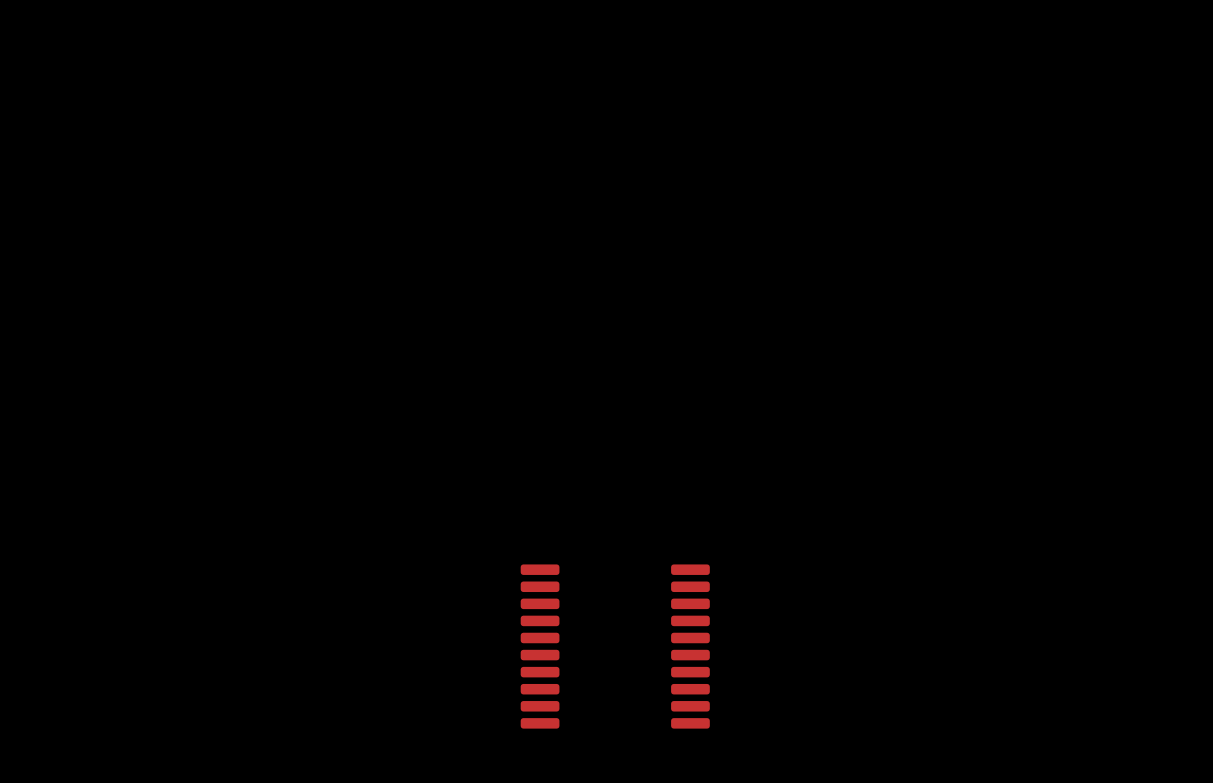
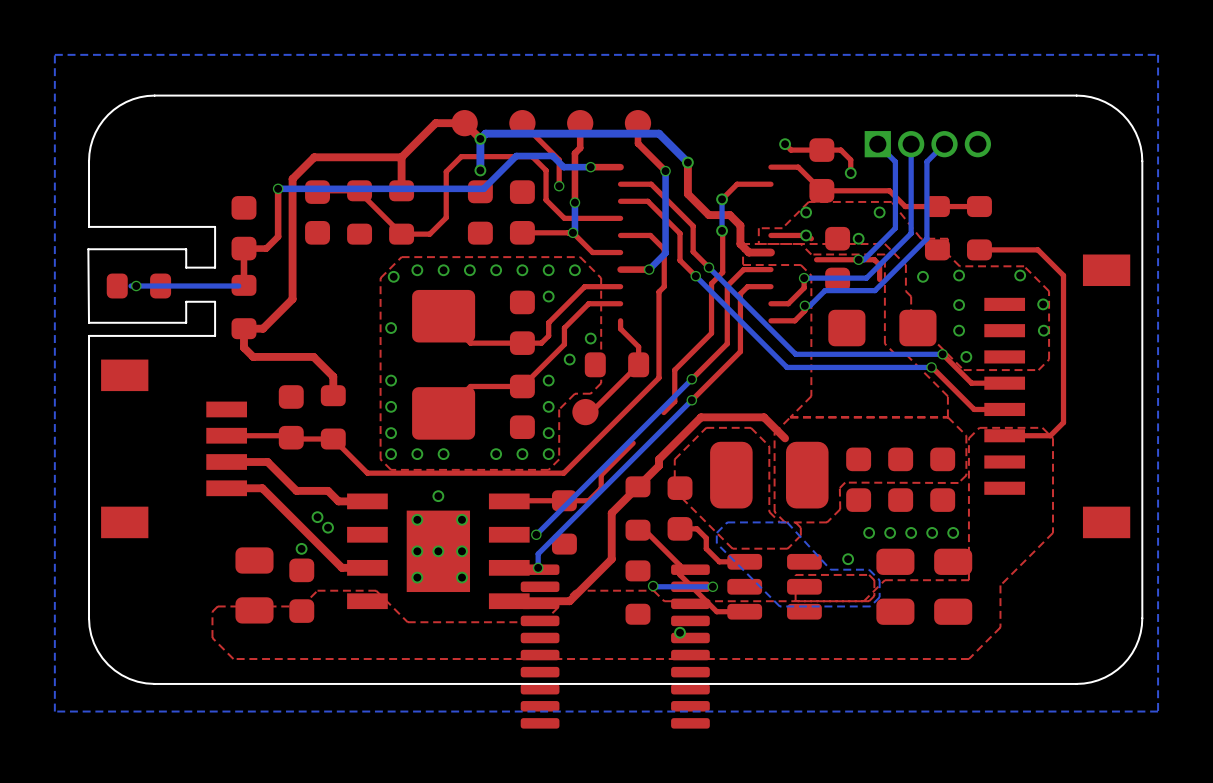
bottom zone outline: none -> (1158, 54) (1158, 711) (54, 711) (54, 54) (1158, 54)
board edge: none -> (1076, 95) (154, 95) (132, 99) (119, 105) (108, 114) (99, 126) (90, 146) (89, 226) (215, 226) (215, 267) (186, 267) (186, 249) (88, 249) (89, 322) (186, 322) (186, 301) (215, 301) (215, 335) (89, 335) (89, 618) (91, 635) (97, 651) (108, 664) (121, 675) (137, 681) (154, 683) (1076, 683) (1091, 682) (1111, 673) (1123, 664) (1132, 653) (1138, 639) (1141, 625) (1141, 153) (1135, 132) (1123, 114) (1105, 102) (1091, 97) (1076, 95)
part: none -> (464, 123)
top track: none -> (522, 123) (559, 159) (559, 186)
part: none -> (522, 123)
top track: none -> (580, 123) (580, 148) (574, 153) (574, 202)
part: none -> (580, 123)
top track: none -> (637, 123) (637, 143) (665, 171)
part: none -> (637, 123)
top track: none -> (480, 138) (464, 123) (435, 123) (401, 157)
via: none -> (480, 138)
top track: none -> (785, 144) (790, 150) (840, 150) (850, 159) (850, 173)
via: none -> (785, 144)
bottom track: none -> (877, 144) (895, 161) (895, 228) (863, 259) (858, 259)
bottom track: none -> (911, 144) (911, 233) (866, 278) (804, 278)
part: none -> (927, 144)
bottom track: none -> (944, 144) (926, 161) (926, 238) (875, 290) (825, 290) (809, 305) (804, 305)
top track: none -> (401, 157) (314, 157) (292, 178) (292, 299) (263, 328) (243, 328) (243, 347) (253, 356) (313, 356) (333, 376) (333, 395)
top track: none -> (401, 157) (402, 191)
top track: none -> (687, 162) (687, 194) (708, 215) (729, 215) (740, 225) (740, 243) (748, 252) (770, 252)
bottom track: none -> (687, 162) (659, 133) (485, 133) (480, 138) (480, 170)
via: none -> (687, 162)
bottom track: none -> (590, 167) (563, 167) (552, 155) (516, 155) (483, 188) (278, 188)
via: none -> (590, 167)
top track: none -> (620, 167) (590, 167)
top track: none -> (770, 167) (798, 167) (821, 190) (889, 190) (905, 206) (979, 206)
via: none -> (480, 170)
part: none -> (821, 170)
bottom track: none -> (665, 171) (665, 253) (649, 269)
via: none -> (665, 171)
via: none -> (850, 173)
top track: none -> (620, 184) (651, 184) (693, 226) (693, 251) (708, 267)
top track: none -> (770, 184) (737, 184) (722, 199)
via: none -> (559, 186)
top track: none -> (278, 188) (278, 236) (266, 248) (243, 248) (243, 285)
via: none -> (278, 188)
top track: none -> (317, 192) (359, 190) (401, 234) (429, 234) (446, 217) (446, 171) (461, 156) (532, 156) (546, 170) (546, 199) (564, 218) (620, 218)
bottom track: none -> (722, 199) (722, 230)
via: none -> (722, 199)
top track: none -> (620, 201) (647, 201) (680, 233) (680, 260) (695, 276)
bottom track: none -> (574, 202) (574, 230) (572, 232)
via: none -> (574, 202)
part: none -> (317, 212)
part: none -> (359, 212)
part: none -> (401, 212)
part: none -> (480, 212)
part: none -> (522, 212)
via: none -> (806, 212)
via: none -> (879, 212)
part: none -> (243, 228)
part: none -> (937, 228)
part: none -> (979, 228)
top track: none -> (722, 230) (722, 272) (711, 283) (711, 333) (674, 370) (674, 401) (663, 412)
via: none -> (722, 230)
top track: none -> (522, 232) (572, 232) (592, 252) (620, 252)
via: none -> (572, 232)
top track: none -> (620, 235) (650, 235) (664, 249) (664, 286) (659, 291) (659, 377) (563, 473) (367, 473) (333, 439) (292, 439) (289, 435) (226, 435)
top track: none -> (770, 235) (808, 235) (811, 238)
via: none -> (806, 235)
via: none -> (858, 238)
top zone outline: none -> (758, 243) (758, 228) (782, 228) (808, 201) (891, 201) (921, 238) (947, 238) (947, 254) (959, 266) (1024, 266) (1049, 291) (1049, 359) (1038, 370) (963, 370) (911, 317) (911, 296) (905, 291) (905, 265) (884, 243) (743, 243) (743, 265) (800, 265) (811, 275) (811, 396) (774, 433) (774, 511) (785, 522)
top zone outline: none -> (800, 243) (811, 254) (884, 254) (884, 343) (895, 354) (905, 354) (947, 396) (947, 417)
top track: none -> (979, 249) (1037, 249) (1063, 275) (1063, 422) (1050, 435) (1007, 435)
top zone outline: none -> (580, 257) (401, 257) (380, 278) (380, 459) (391, 469) (548, 469) (559, 459) (559, 409) (574, 393) (590, 393) (601, 383) (601, 278) (580, 257)
top track: none -> (816, 259) (874, 259) (879, 265) (879, 279)
part: none -> (837, 259)
via: none -> (858, 259)
bottom track: none -> (708, 267) (795, 354) (942, 354)
via: none -> (708, 267)
top track: none -> (649, 269) (620, 269)
via: none -> (649, 269)
top track: none -> (770, 269) (743, 269) (727, 286) (727, 343) (691, 379)
via: none -> (417, 270)
via: none -> (443, 270)
via: none -> (469, 270)
via: none -> (496, 270)
via: none -> (522, 270)
via: none -> (548, 270)
via: none -> (574, 270)
via: none -> (959, 275)
via: none -> (1020, 275)
via: none -> (393, 276)
bottom track: none -> (695, 276) (787, 367) (931, 367)
via: none -> (695, 276)
via: none -> (922, 276)
top track: none -> (804, 278) (804, 287) (788, 303) (770, 303)
via: none -> (804, 278)
via: none -> (136, 286)
part: none -> (138, 286)
bottom track: none -> (238, 286) (131, 286)
top track: none -> (620, 286) (584, 286) (548, 322) (548, 335) (541, 343) (470, 343) (443, 316)
top track: none -> (770, 286) (747, 286) (740, 293) (740, 351) (691, 400)
via: none -> (548, 296)
top track: none -> (620, 303) (588, 303) (564, 328) (564, 344) (522, 386) (470, 386) (443, 413)
via: none -> (1043, 304)
top track: none -> (804, 305) (804, 310) (794, 320) (770, 320)
via: none -> (804, 305)
via: none -> (959, 305)
part: none -> (243, 307)
top track: none -> (620, 320) (620, 328) (638, 346) (638, 364) (591, 412) (585, 412)
part: none -> (522, 322)
via: none -> (391, 328)
part: none -> (882, 328)
via: none -> (959, 330)
via: none -> (1043, 330)
via: none -> (590, 338)
top track: none -> (942, 354) (971, 383) (1007, 383)
via: none -> (942, 354)
via: none -> (966, 356)
via: none -> (569, 359)
part: none -> (443, 364)
part: none -> (616, 364)
top track: none -> (931, 367) (974, 409) (1007, 409)
via: none -> (931, 367)
bottom track: none -> (691, 379) (536, 534)
via: none -> (691, 379)
via: none -> (391, 380)
via: none -> (548, 380)
part: none -> (1057, 396)
bottom track: none -> (691, 400) (538, 553) (538, 567)
via: none -> (691, 400)
via: none -> (391, 406)
part: none -> (522, 406)
via: none -> (548, 406)
part: none -> (585, 412)
part: none -> (291, 417)
part: none -> (333, 417)
top zone outline: none -> (947, 417) (790, 417)
top zone outline: none -> (947, 417) (966, 435) (966, 475) (958, 482) (845, 482) (839, 488) (840, 509) (827, 522) (779, 522) (769, 511) (769, 446) (750, 427) (706, 427) (674, 459) (674, 490) (732, 548) (787, 548) (800, 535) (800, 527) (795, 522)
via: none -> (391, 433)
via: none -> (548, 433)
top track: none -> (785, 438) (764, 417) (701, 417) (659, 459) (659, 465) (611, 513) (611, 559) (569, 601) (509, 601)
top track: none -> (633, 443) (601, 475) (601, 488) (588, 500) (509, 501)
part: none -> (174, 448)
via: none -> (391, 454)
via: none -> (417, 454)
via: none -> (443, 454)
via: none -> (496, 454)
via: none -> (522, 454)
via: none -> (548, 454)
top track: none -> (226, 462) (267, 462) (296, 490) (328, 490) (338, 501) (367, 501)
part: none -> (769, 475)
part: none -> (858, 479)
part: none -> (900, 479)
part: none -> (942, 479)
top track: none -> (226, 488) (262, 488) (341, 567) (367, 567)
via: none -> (438, 496)
part: none -> (637, 508)
part: none -> (680, 508)
via: none -> (317, 517)
via: none -> (417, 519)
via: none -> (462, 519)
part: none -> (564, 522)
bottom zone outline: none -> (787, 522) (727, 522) (716, 532) (716, 543) (779, 606) (870, 606) (879, 597) (879, 580) (869, 569) (830, 569) (787, 522)
via: none -> (328, 527)
top track: none -> (680, 528) (696, 528) (706, 538) (706, 548) (719, 561) (744, 561)
top track: none -> (644, 530) (680, 565) (680, 574) (716, 611) (744, 611)
via: none -> (869, 532)
via: none -> (890, 532)
via: none -> (911, 532)
via: none -> (932, 532)
via: none -> (953, 532)
via: none -> (536, 534)
via: none -> (301, 548)
via: none -> (417, 551)
part: none -> (438, 551)
via: none -> (438, 551)
via: none -> (462, 551)
via: none -> (848, 559)
via: none -> (538, 567)
via: none -> (417, 577)
via: none -> (462, 577)
part: none -> (254, 585)
bottom track: none -> (653, 586) (712, 586)
via: none -> (653, 586)
via: none -> (712, 586)
part: none -> (774, 586)
part: none -> (895, 586)
part: none -> (953, 586)
part: none -> (301, 590)
part: none -> (637, 592)
top zone outline: none -> (863, 601) (884, 580) (968, 580) (968, 438) (979, 427) (1042, 427) (1053, 438) (1053, 532) (1000, 585) (1000, 627) (968, 659) (233, 659) (212, 637) (212, 611) (217, 606) (301, 606) (317, 590) (376, 590) (407, 622) (543, 622) (574, 590) (653, 590) (664, 601) (869, 601) (874, 595) (874, 580) (869, 574) (795, 574) (795, 601)
via: none -> (680, 632)

